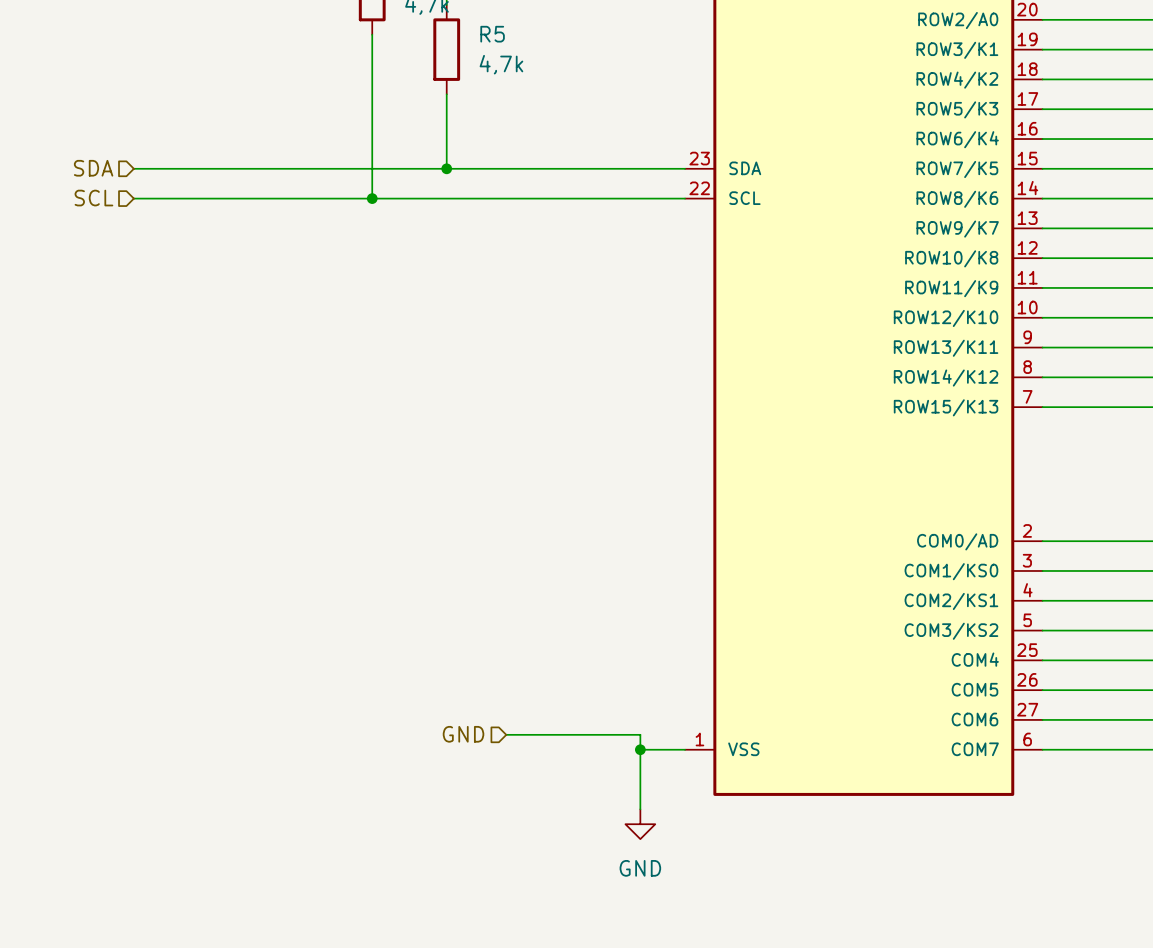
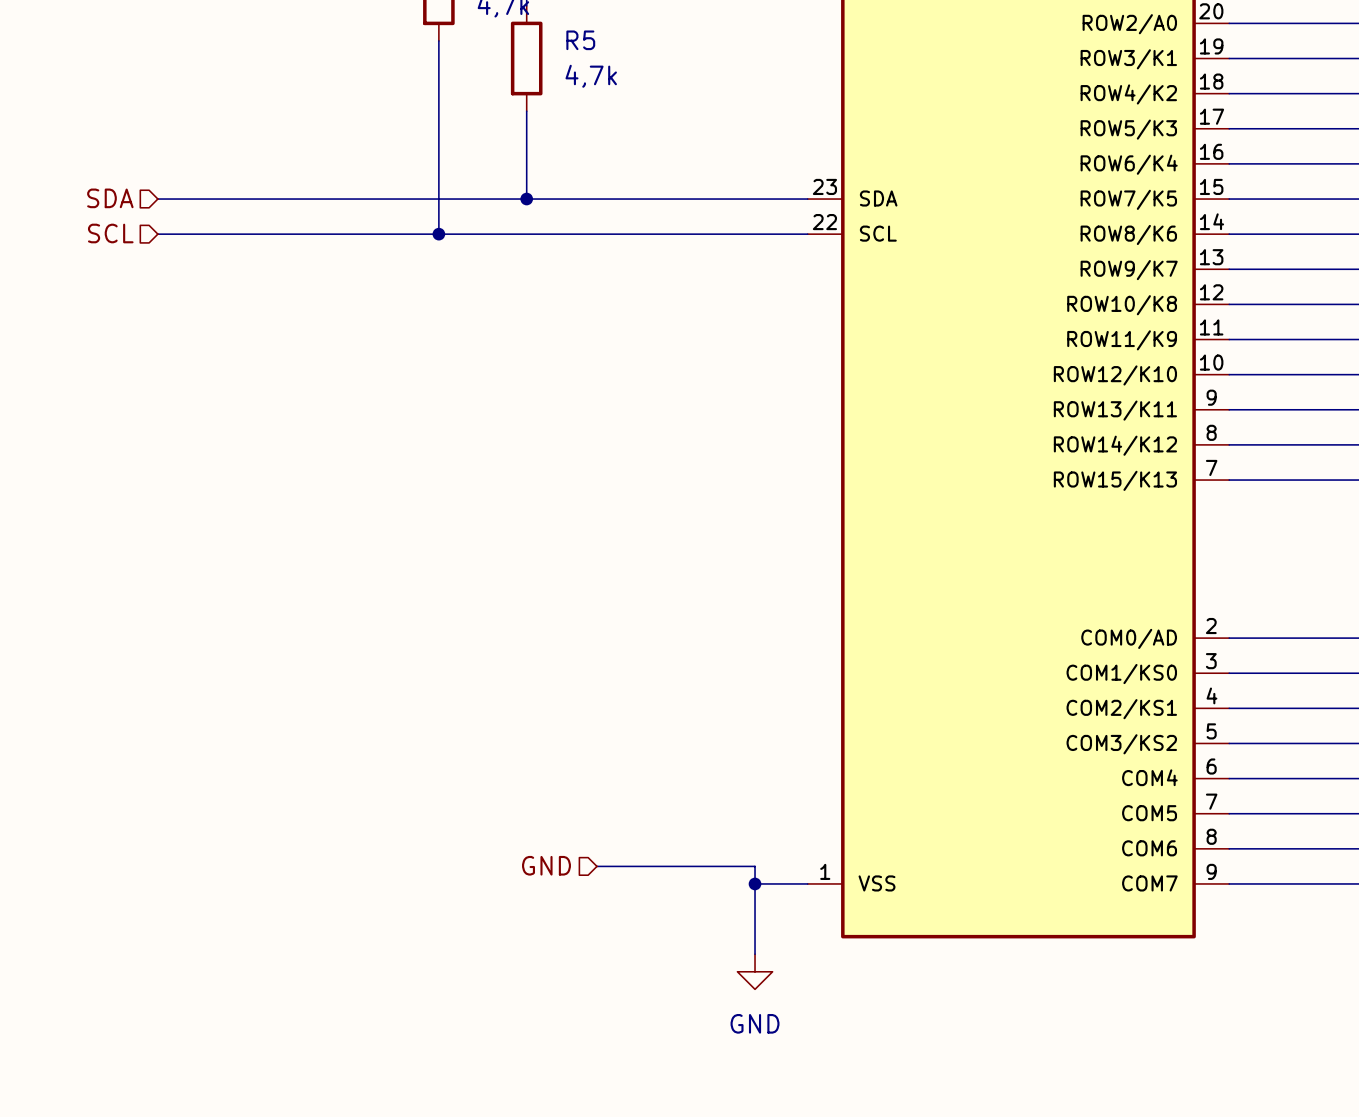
part pin number: 25 (1027, 650) -> 6 (1211, 766)
part pin number: 26 (1027, 679) -> 7 (1211, 801)
part pin number: 27 (1027, 709) -> 8 (1211, 836)
part pin number: 6 (1027, 739) -> 9 (1211, 871)

